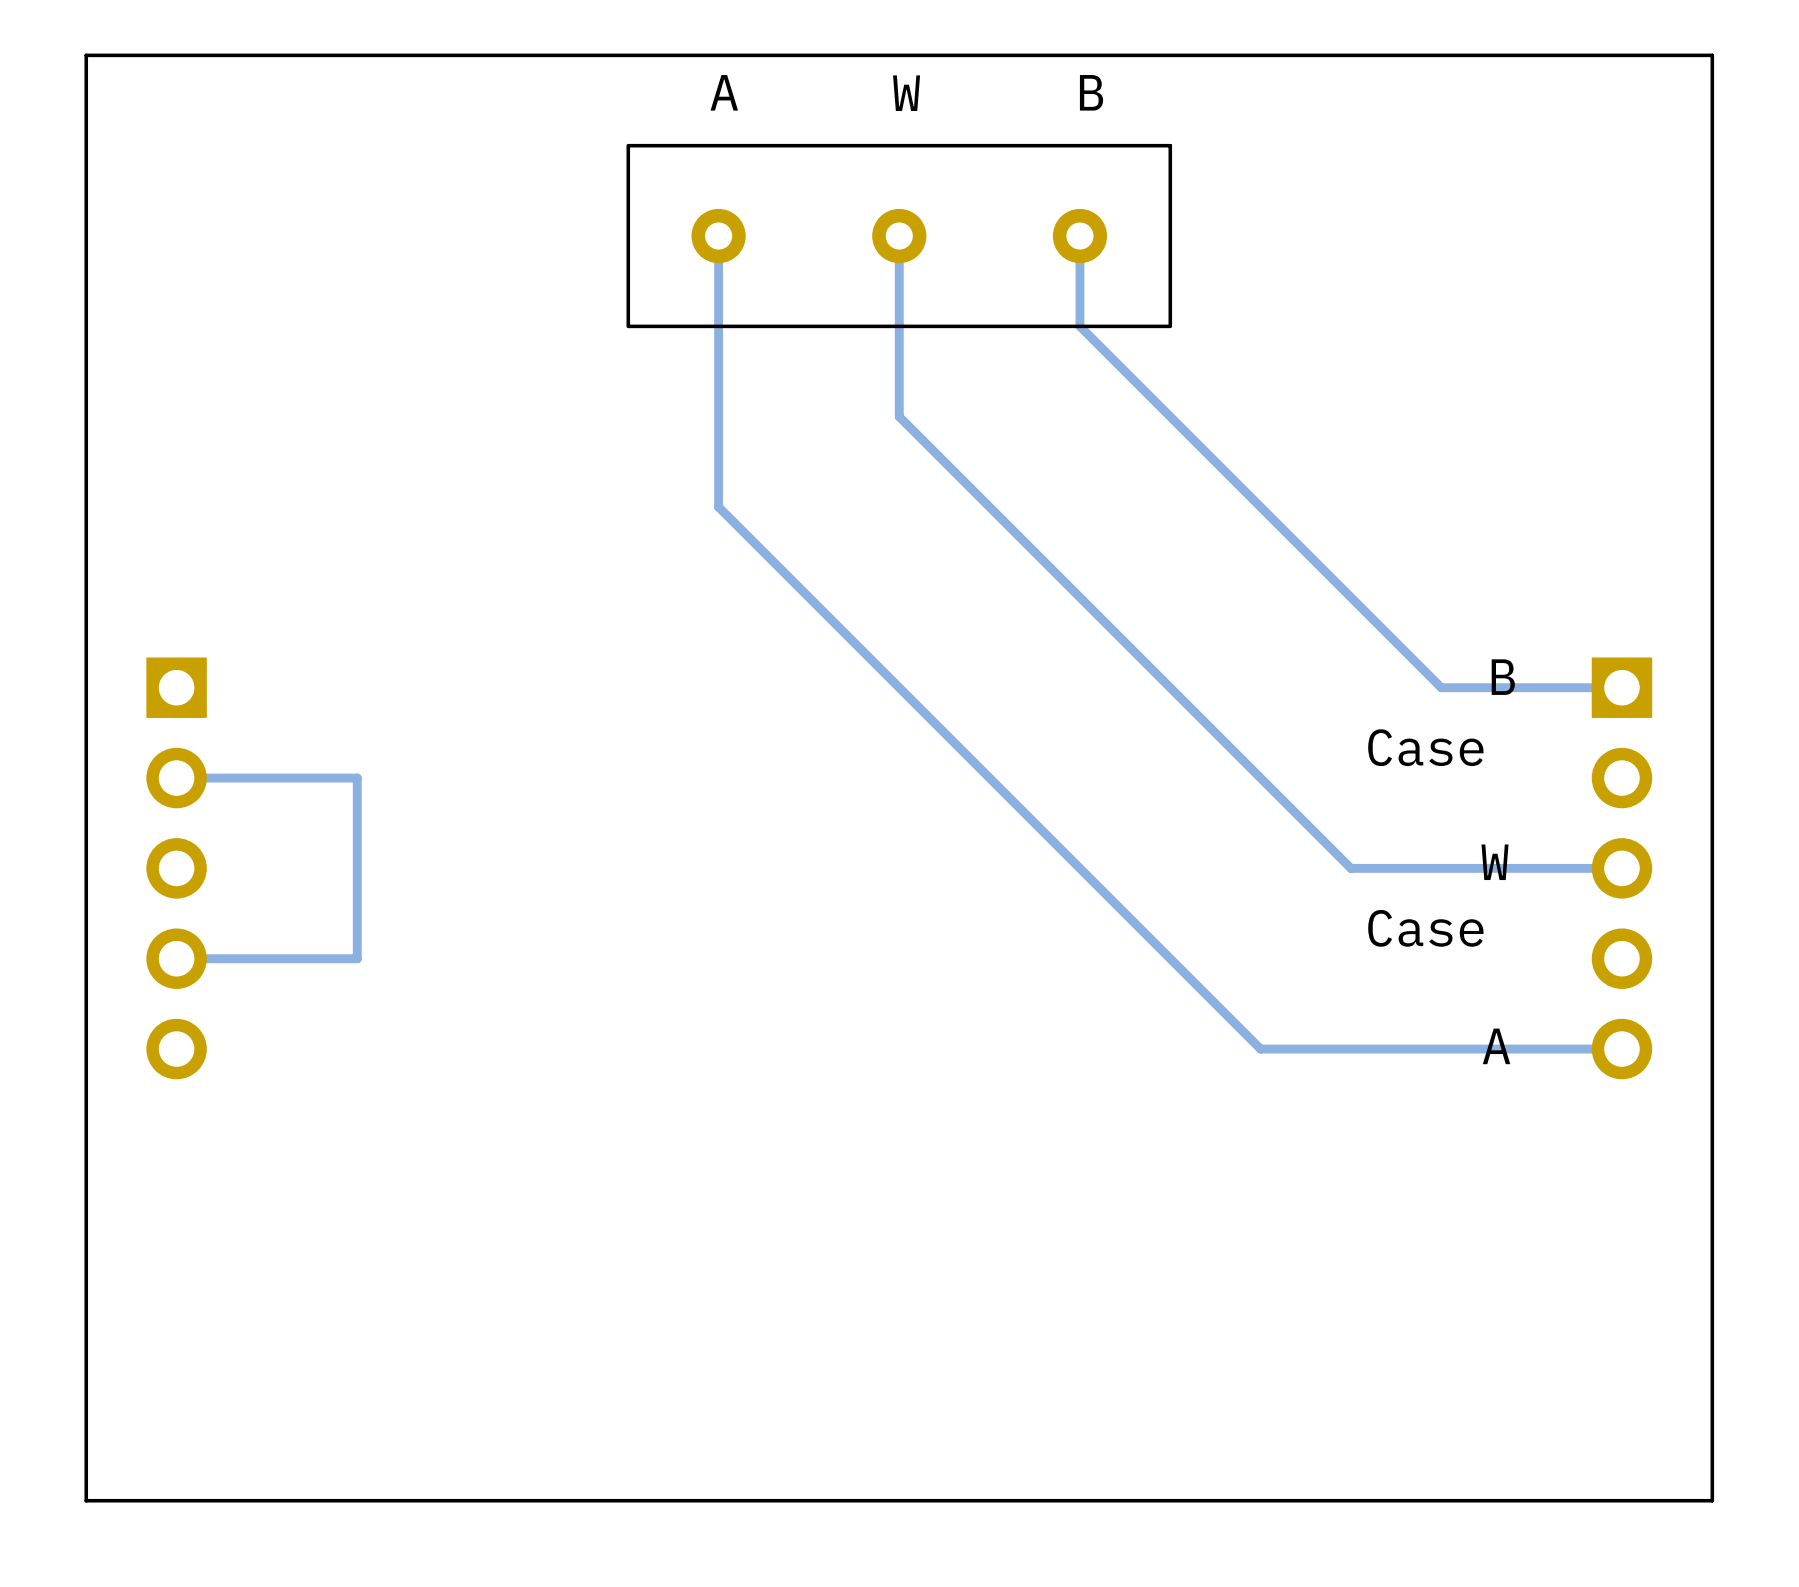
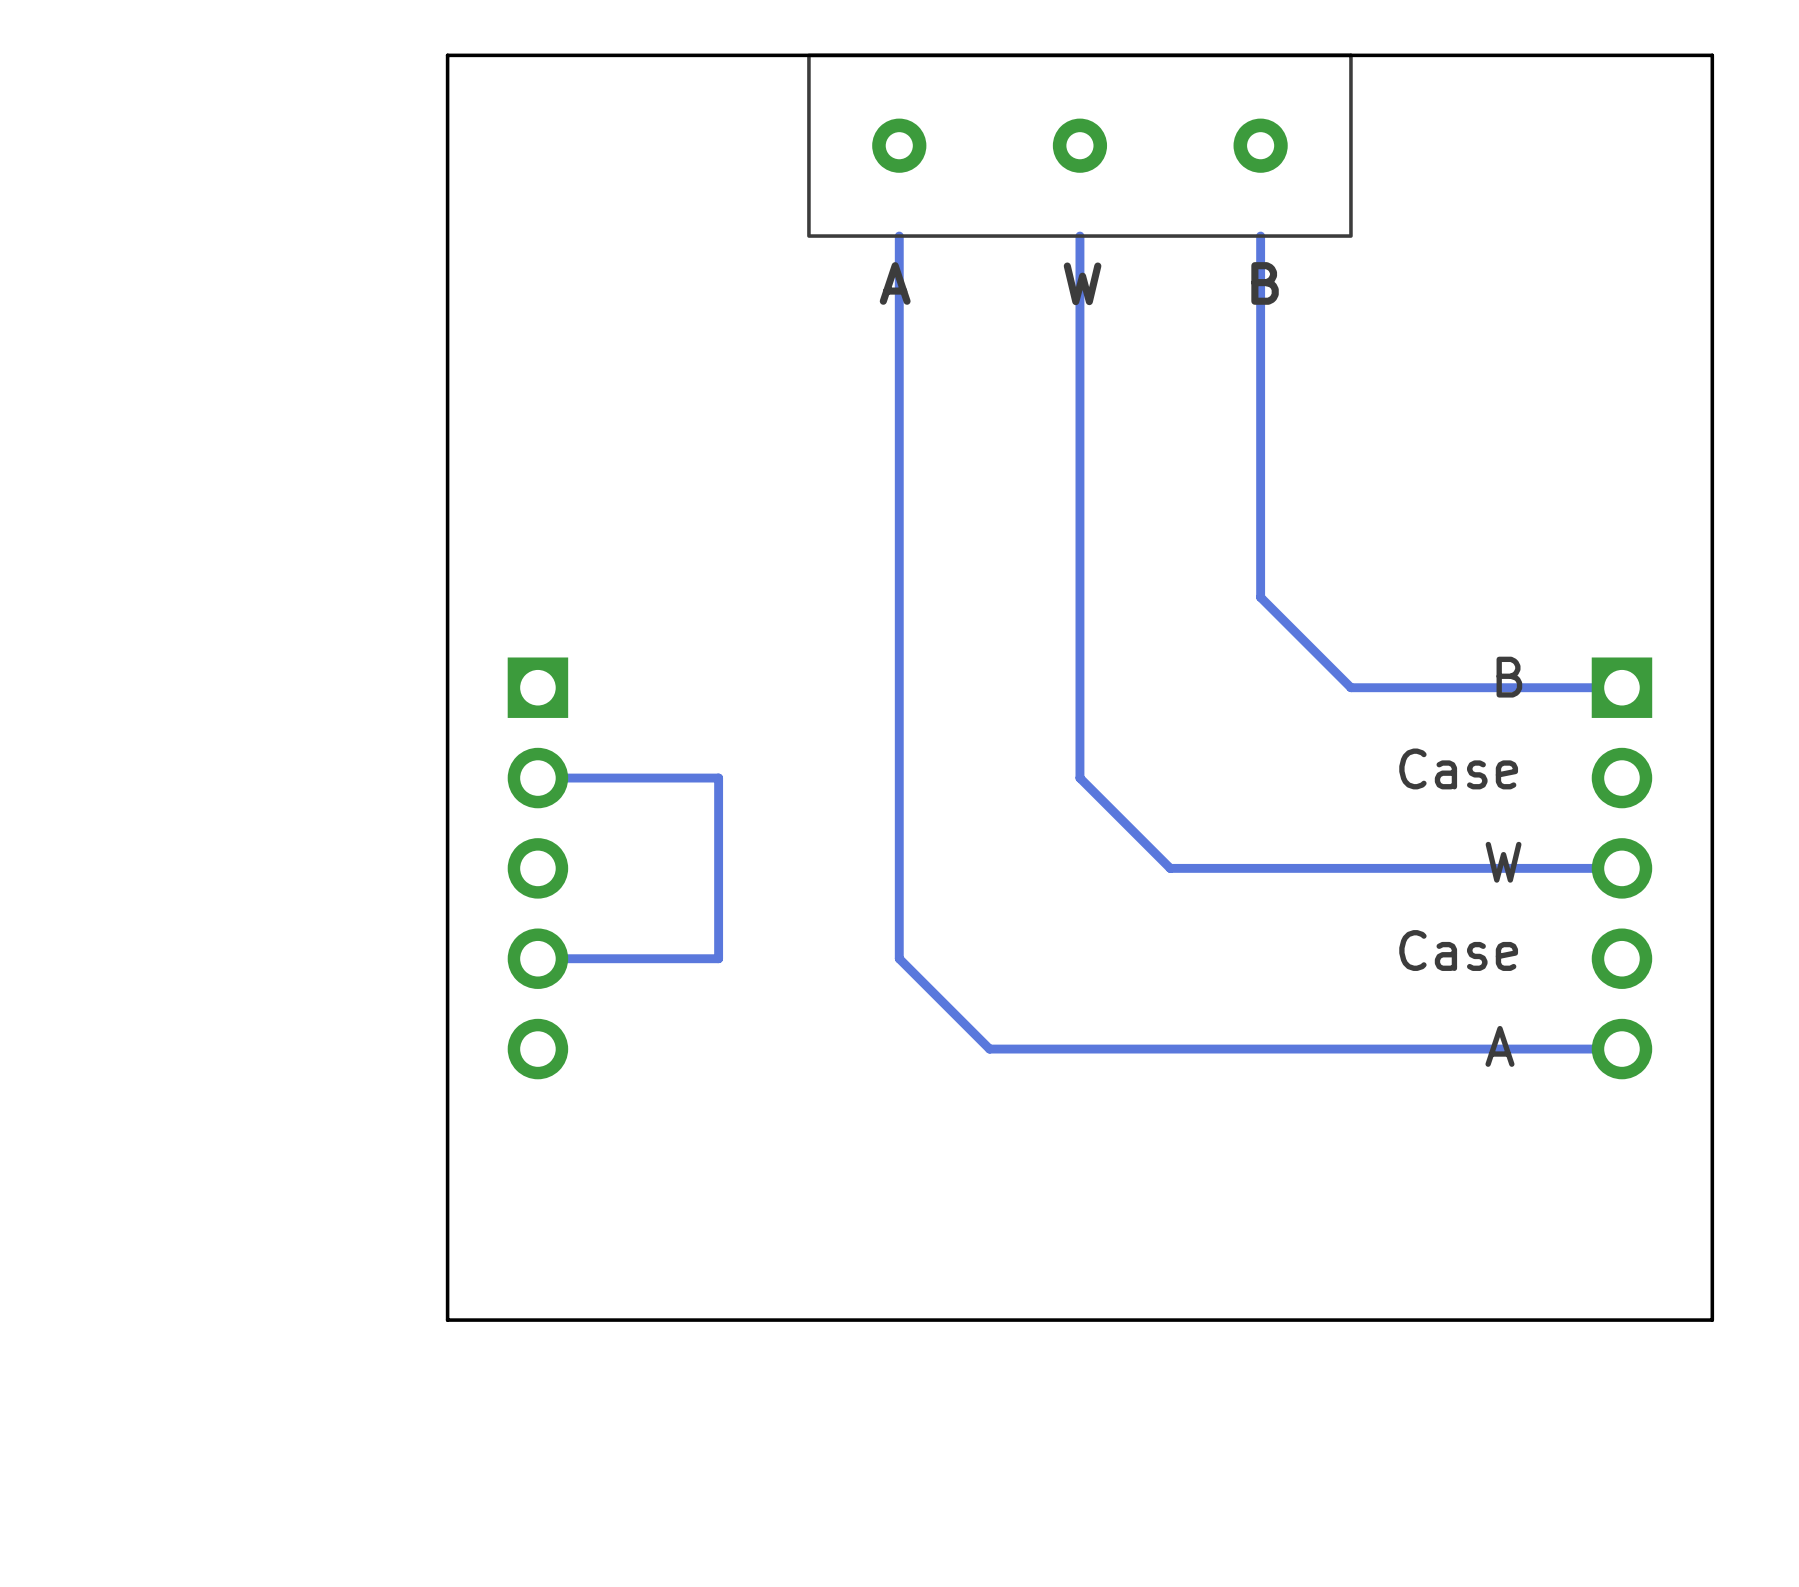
board edge: (447, 55) (86, 55) (86, 1500) (1712, 1500) (1712, 1320) -> (447, 55) (447, 1320) (1712, 1320)
part: none -> (1079, 145)
track: (718, 236) (718, 507) (1260, 1049) -> none
part: (899, 236) -> none
track: none -> (1260, 236) (1260, 597) (1350, 687) (1441, 687)
track: (1079, 326) (1441, 687) -> (1079, 326) (1079, 778) (1170, 868) (1350, 868)
track: (899, 416) (1350, 868) -> (899, 416) (899, 958) (989, 1049) (1260, 1049)
text position: Case (1425, 747) -> Case (1458, 768)
track: (176, 778) (357, 778) (357, 958) (176, 958) -> (537, 778) (718, 778) (718, 958) (537, 958)
part position: (176, 868) -> (537, 868)
text position: Case (1425, 928) -> Case (1458, 950)

